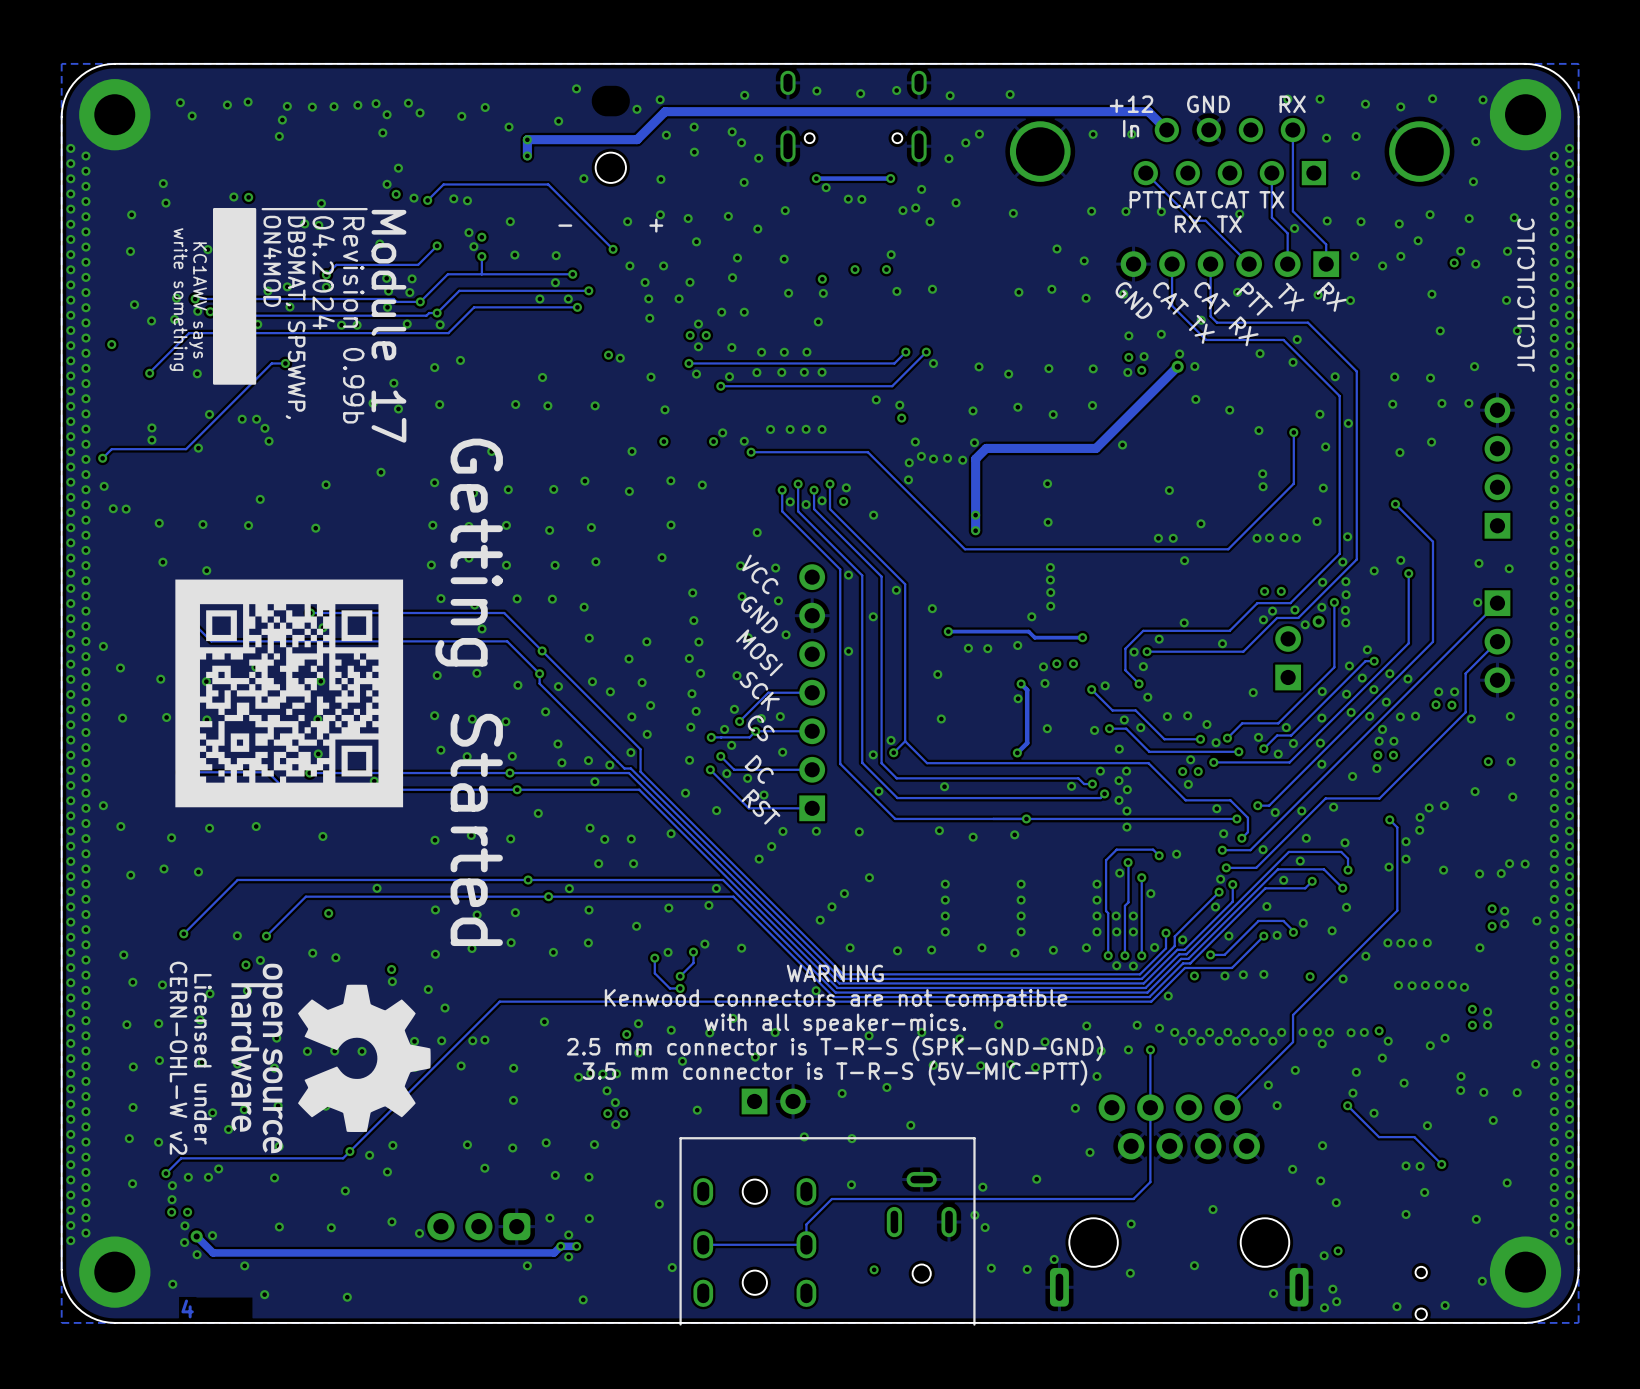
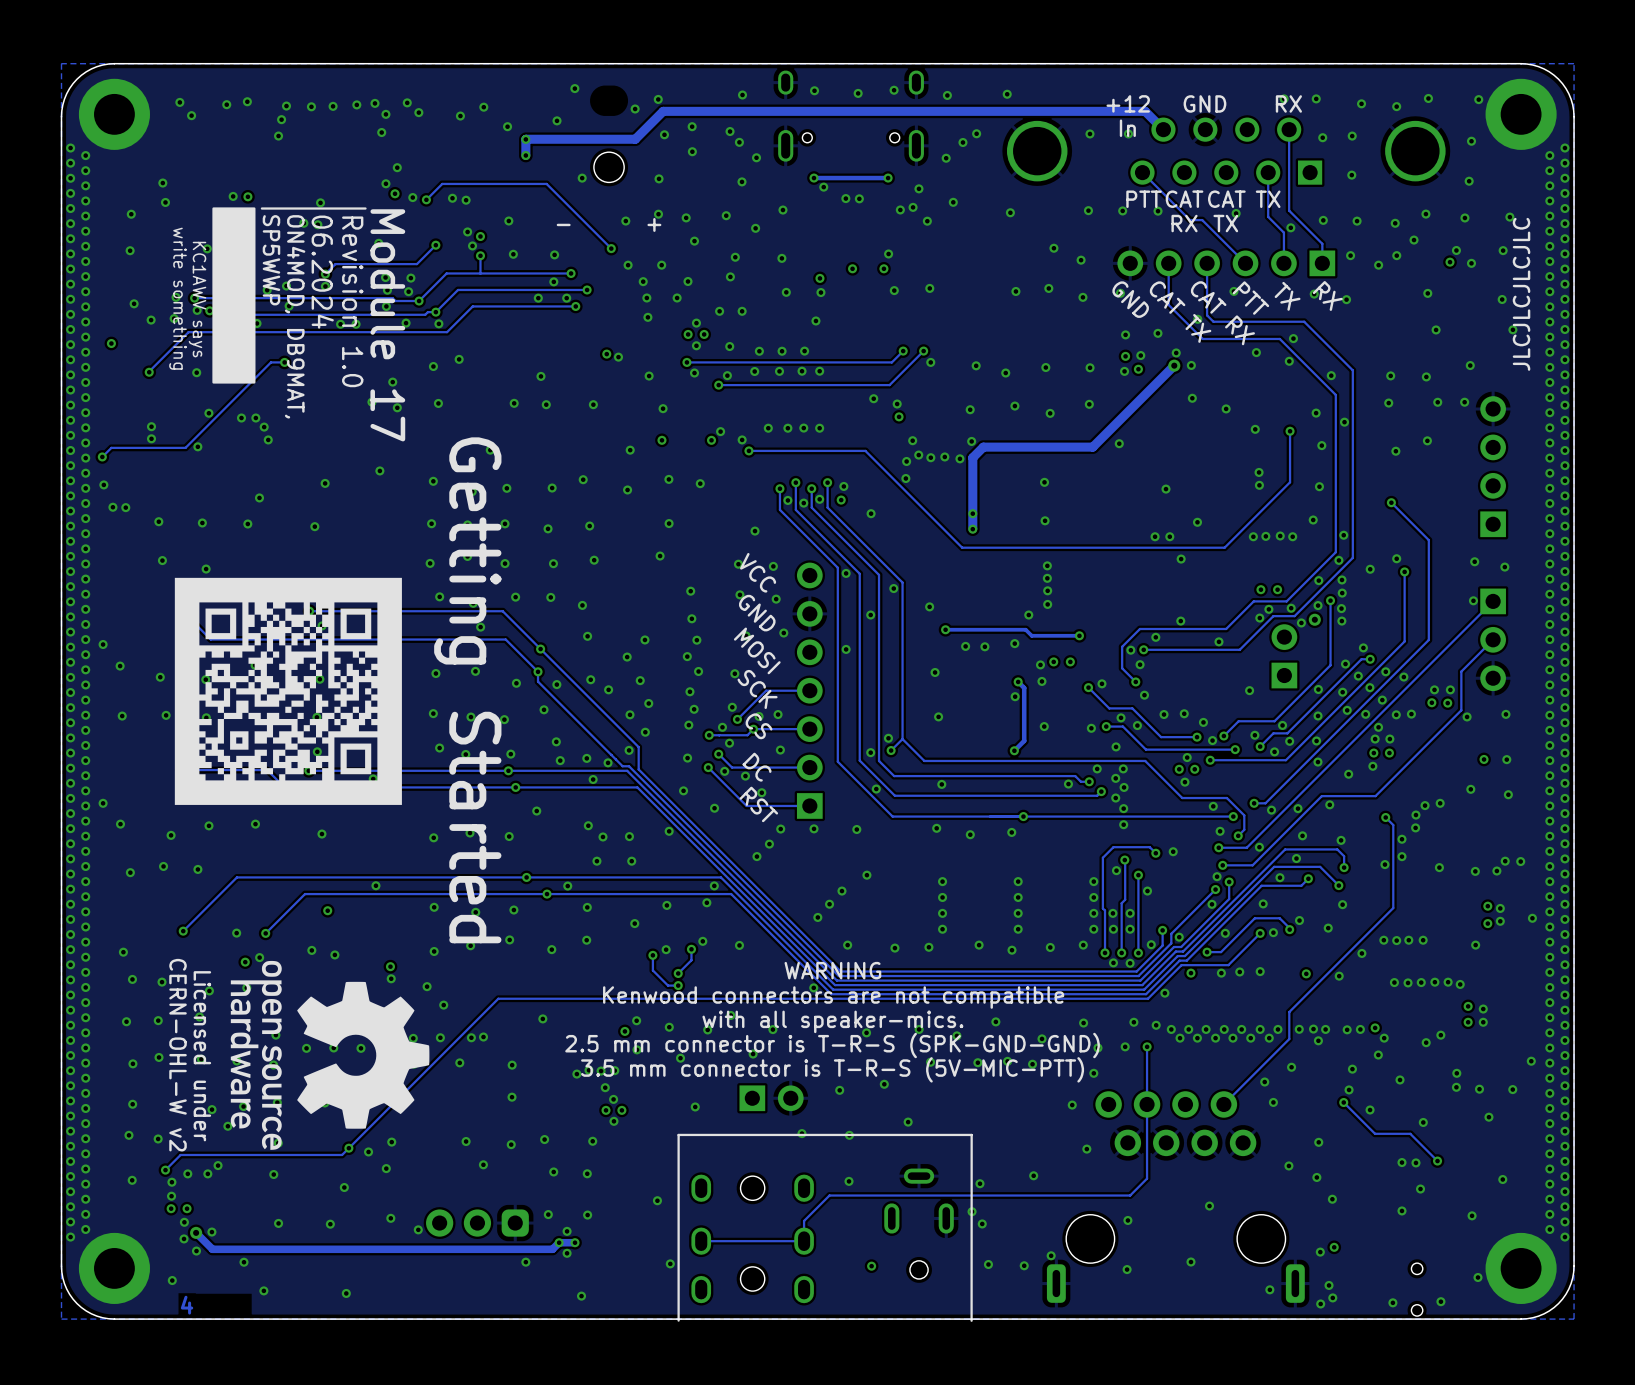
text: ON4MOD (272, 261) -> SP5WWP (271, 260)
text: 04.2024 (323, 272) -> 06.2024 (322, 272)
text: DB9MAT, SP5WWP, (295, 317) -> ON4MOD, DB9MAT, (295, 316)
text: Revision 0.99b (353, 320) -> Revision 1.0 (352, 301)

